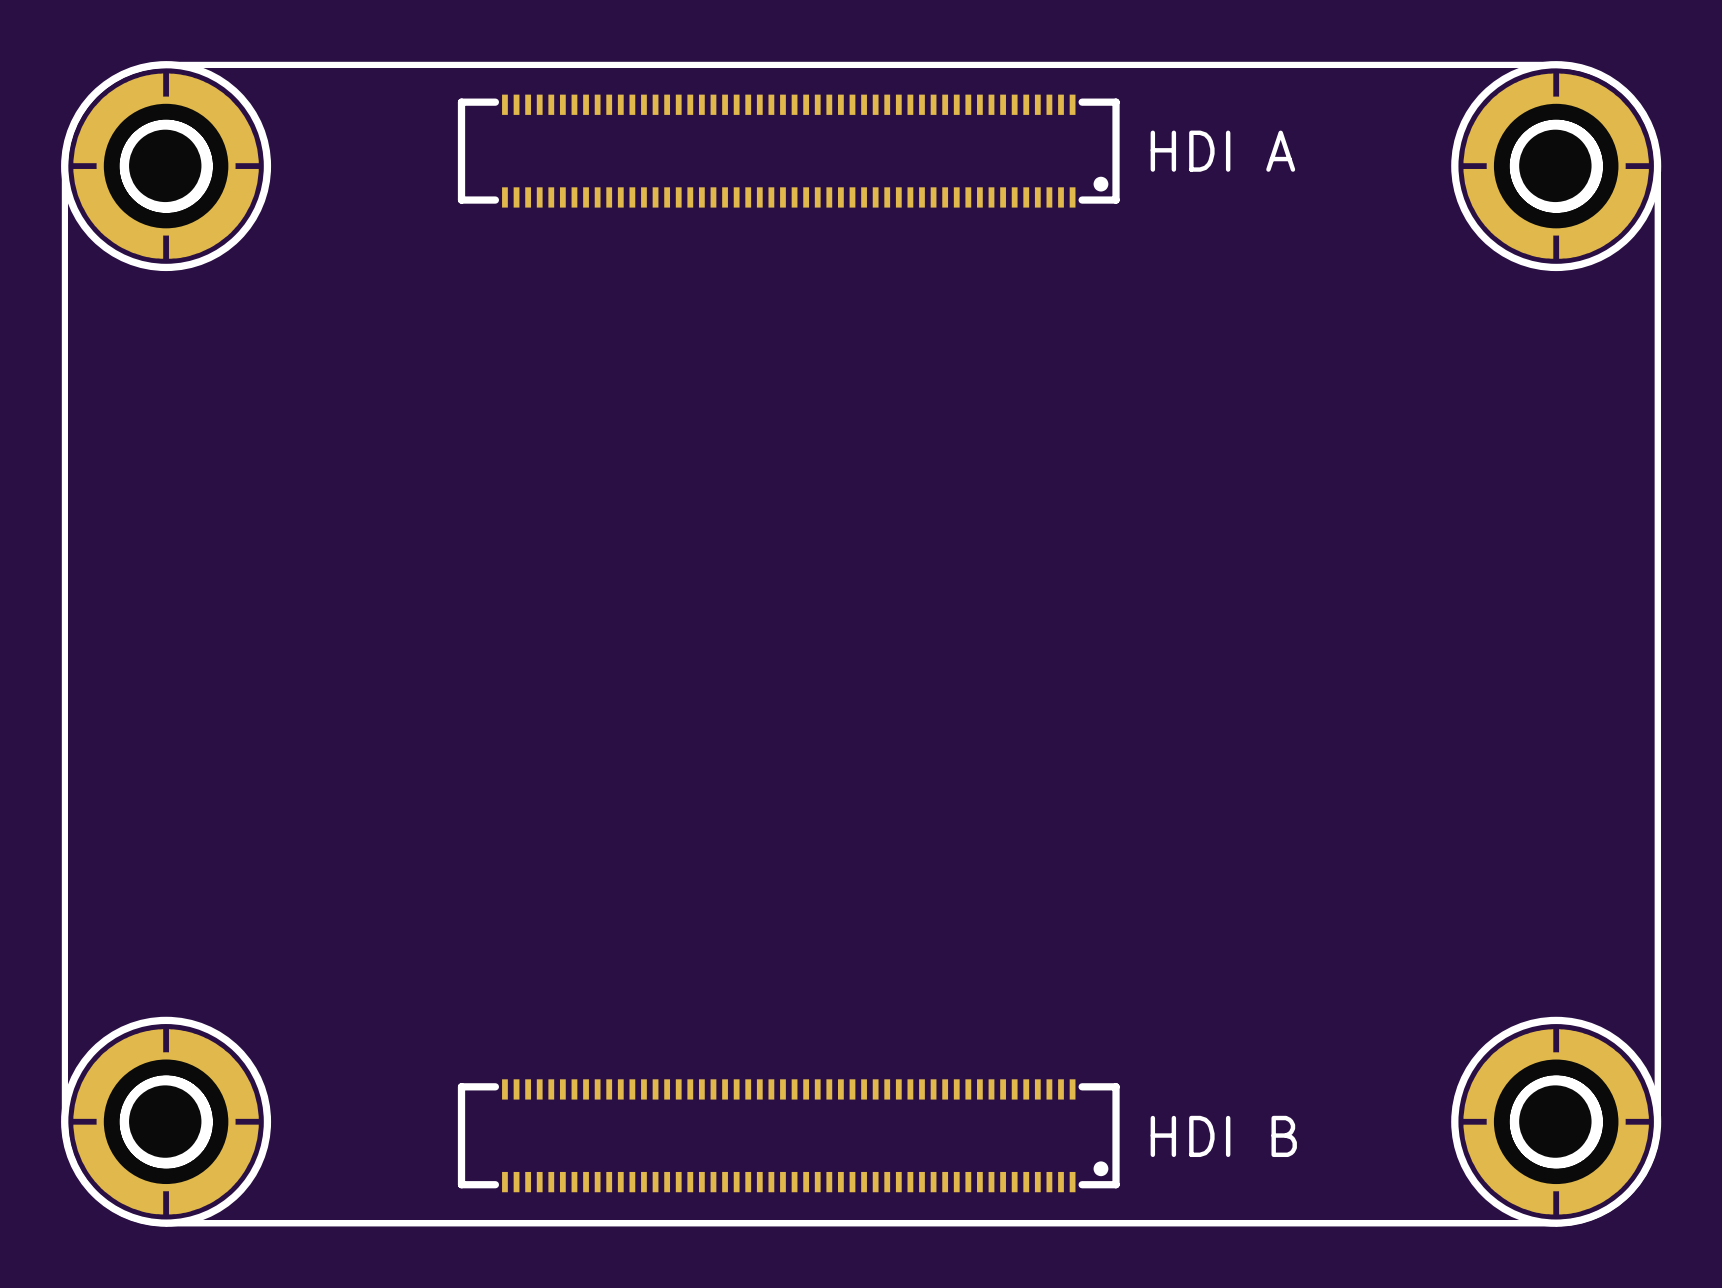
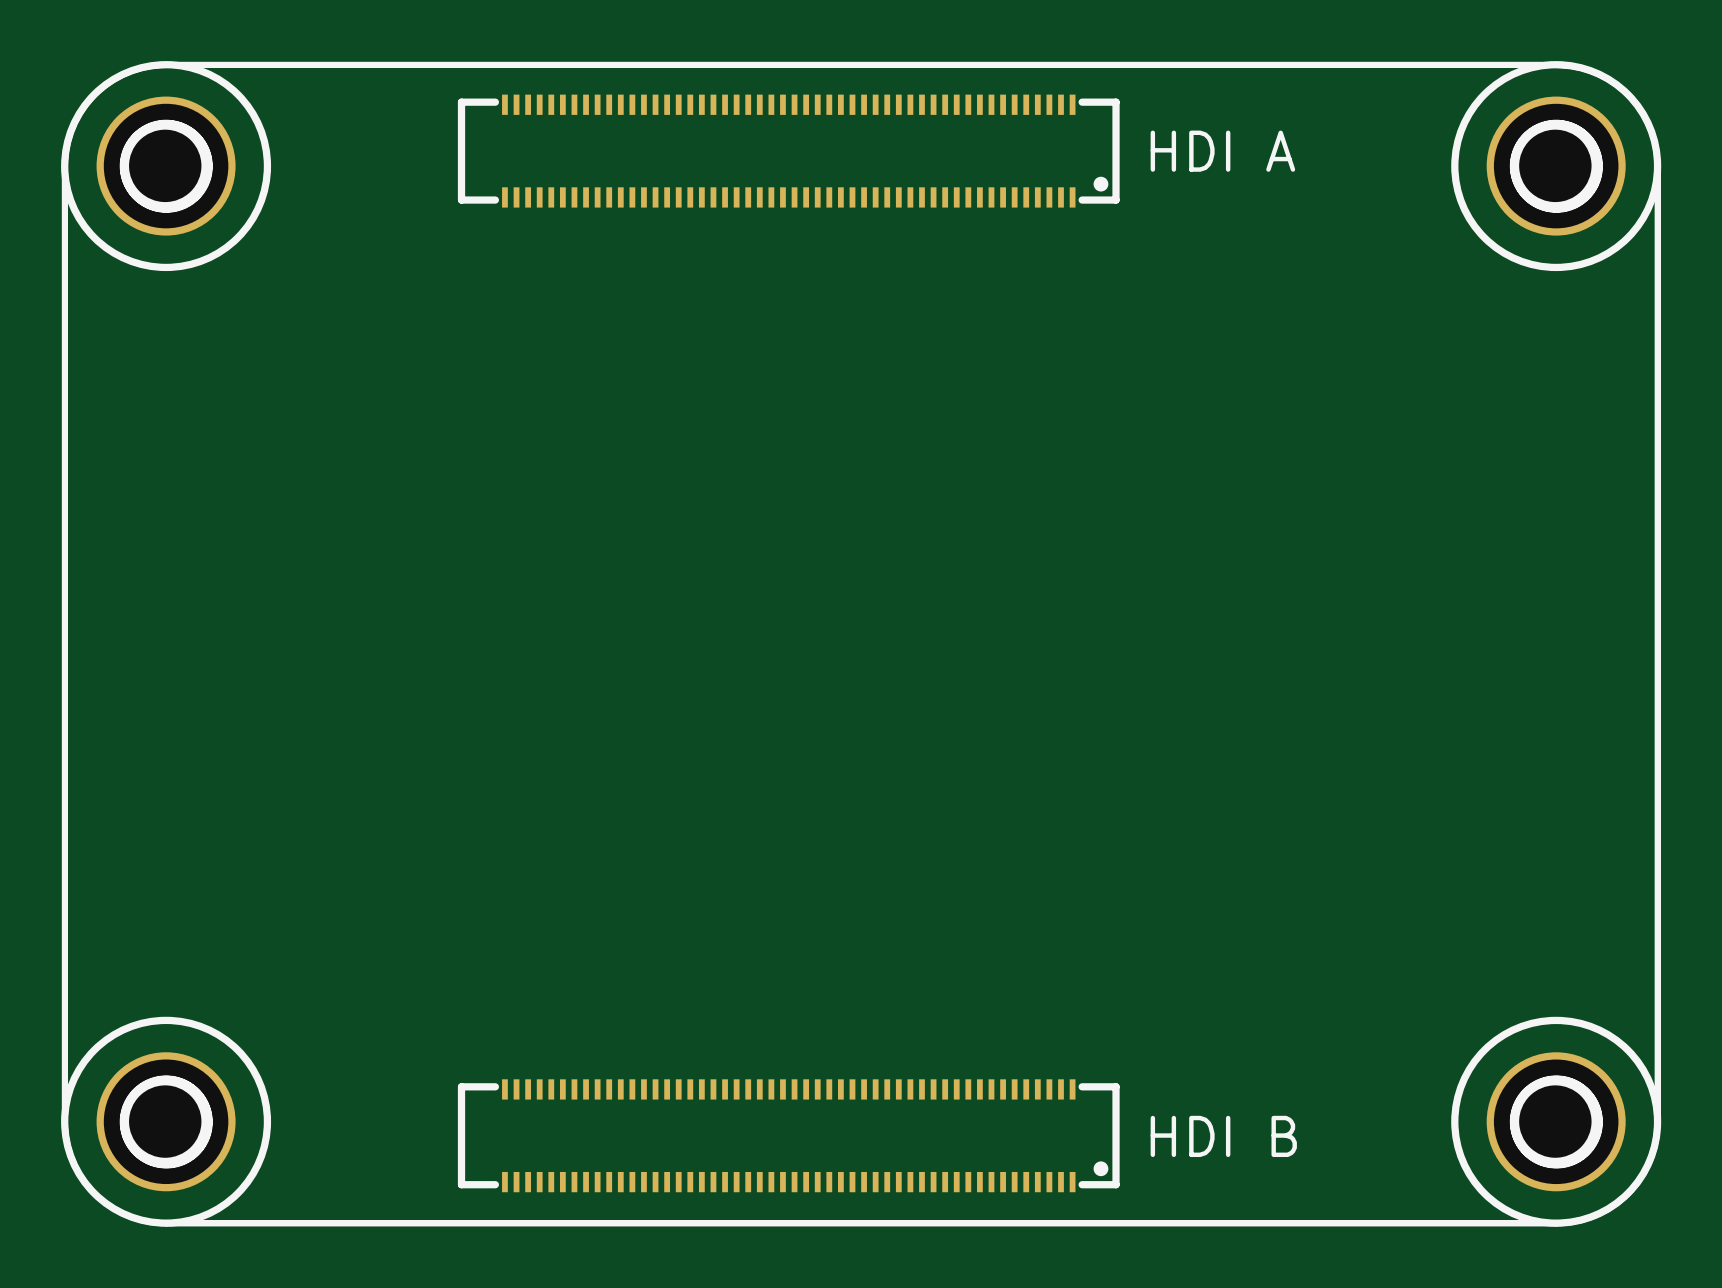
part footprint: [61, 61, 272, 272] -> [61, 61, 272, 272]
part footprint: [1451, 61, 1662, 272] -> [1451, 61, 1662, 272]
part footprint: [61, 1016, 272, 1227] -> [61, 1016, 272, 1227]
part footprint: [1451, 1016, 1662, 1227] -> [1451, 1016, 1662, 1227]

